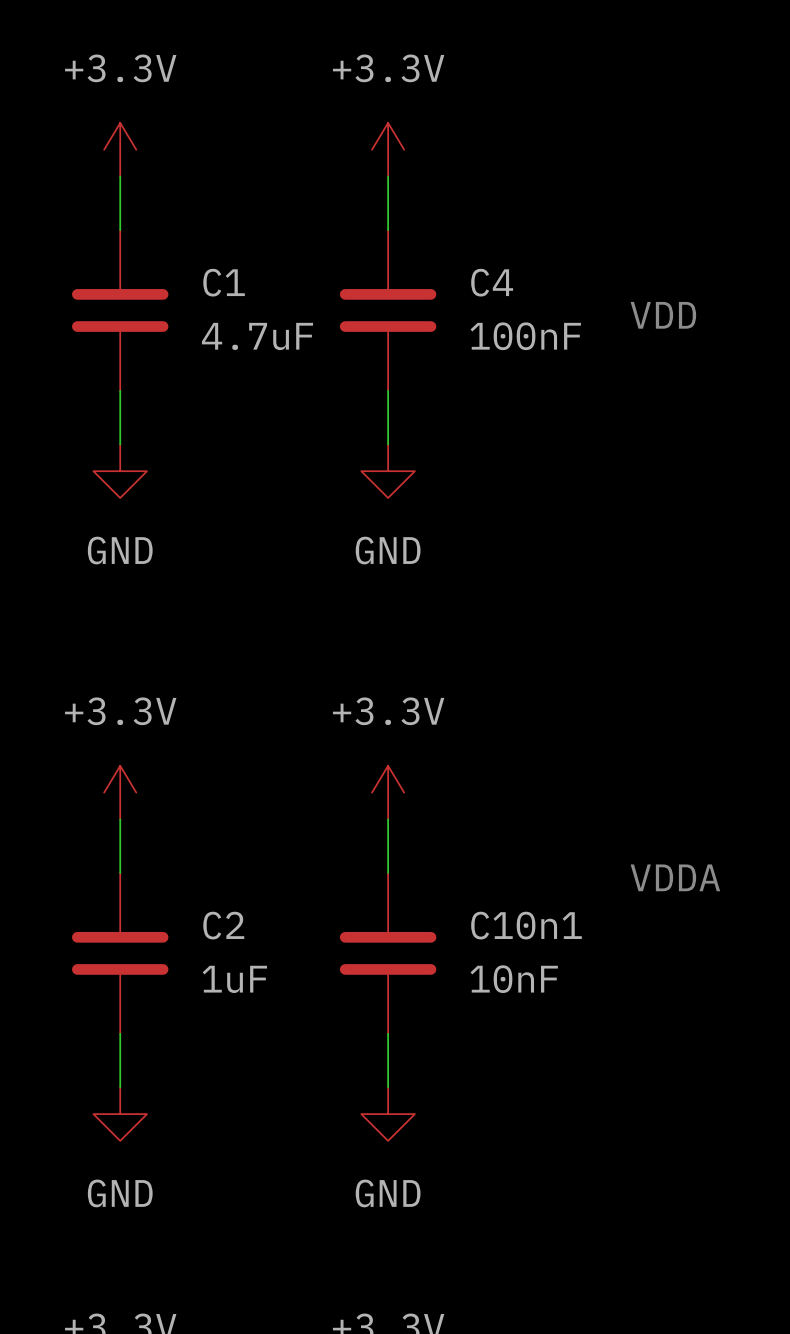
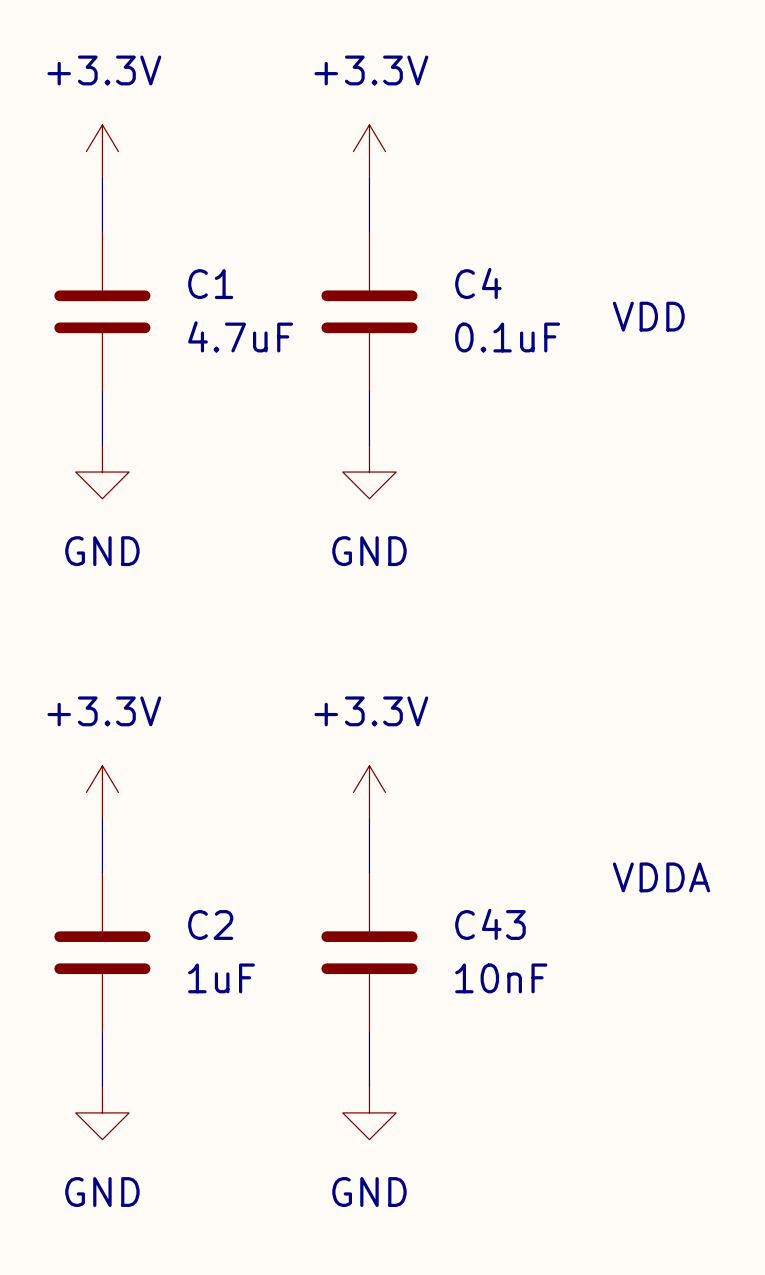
C4 value: 100nF (525, 336) -> 0.1uF (507, 337)
C10n1 name: C10n1 (526, 925) -> C43 (490, 924)

